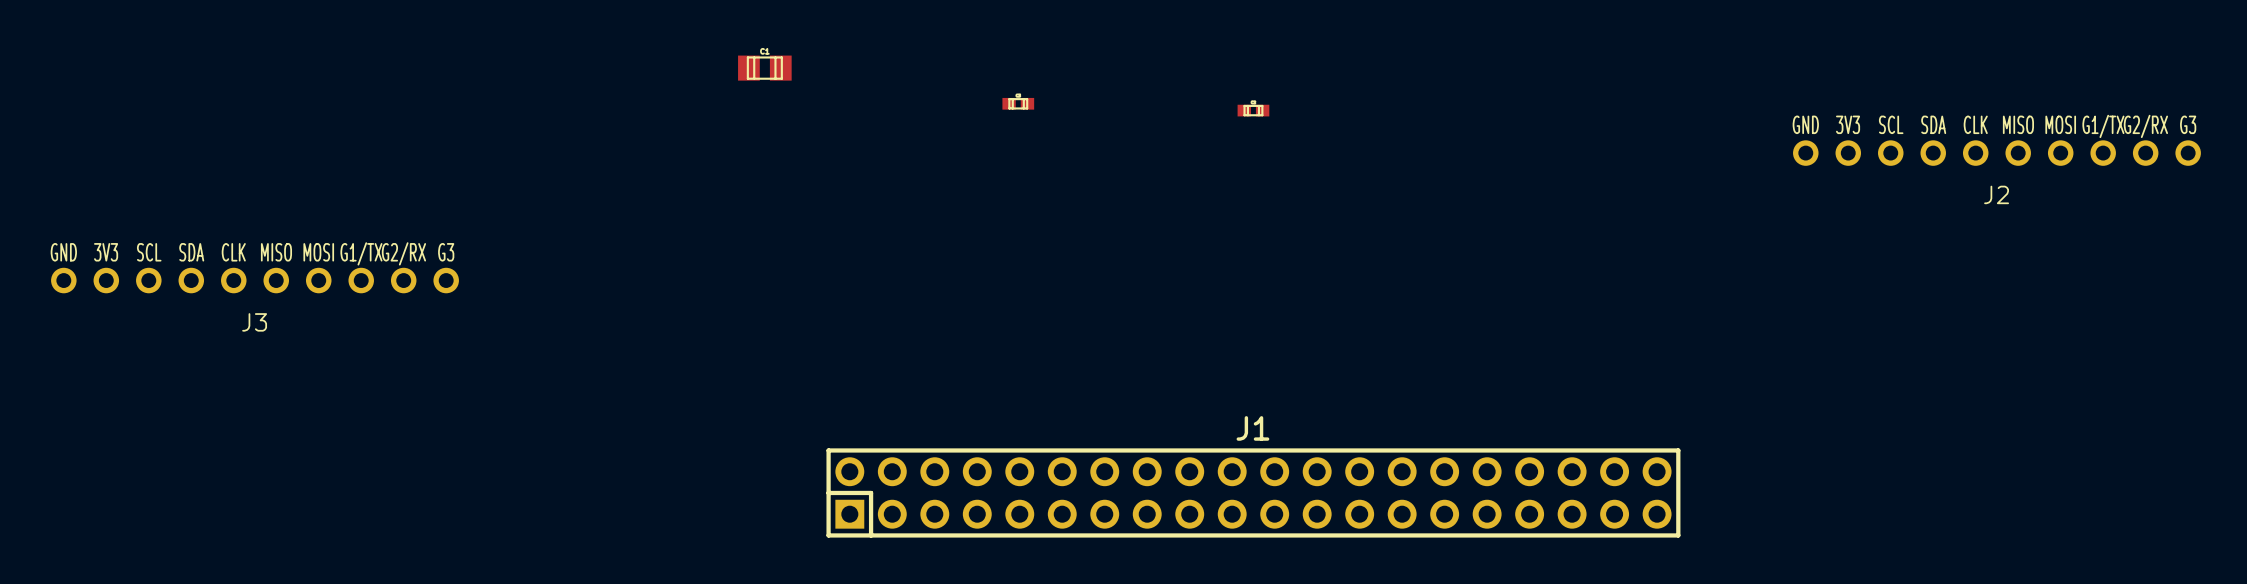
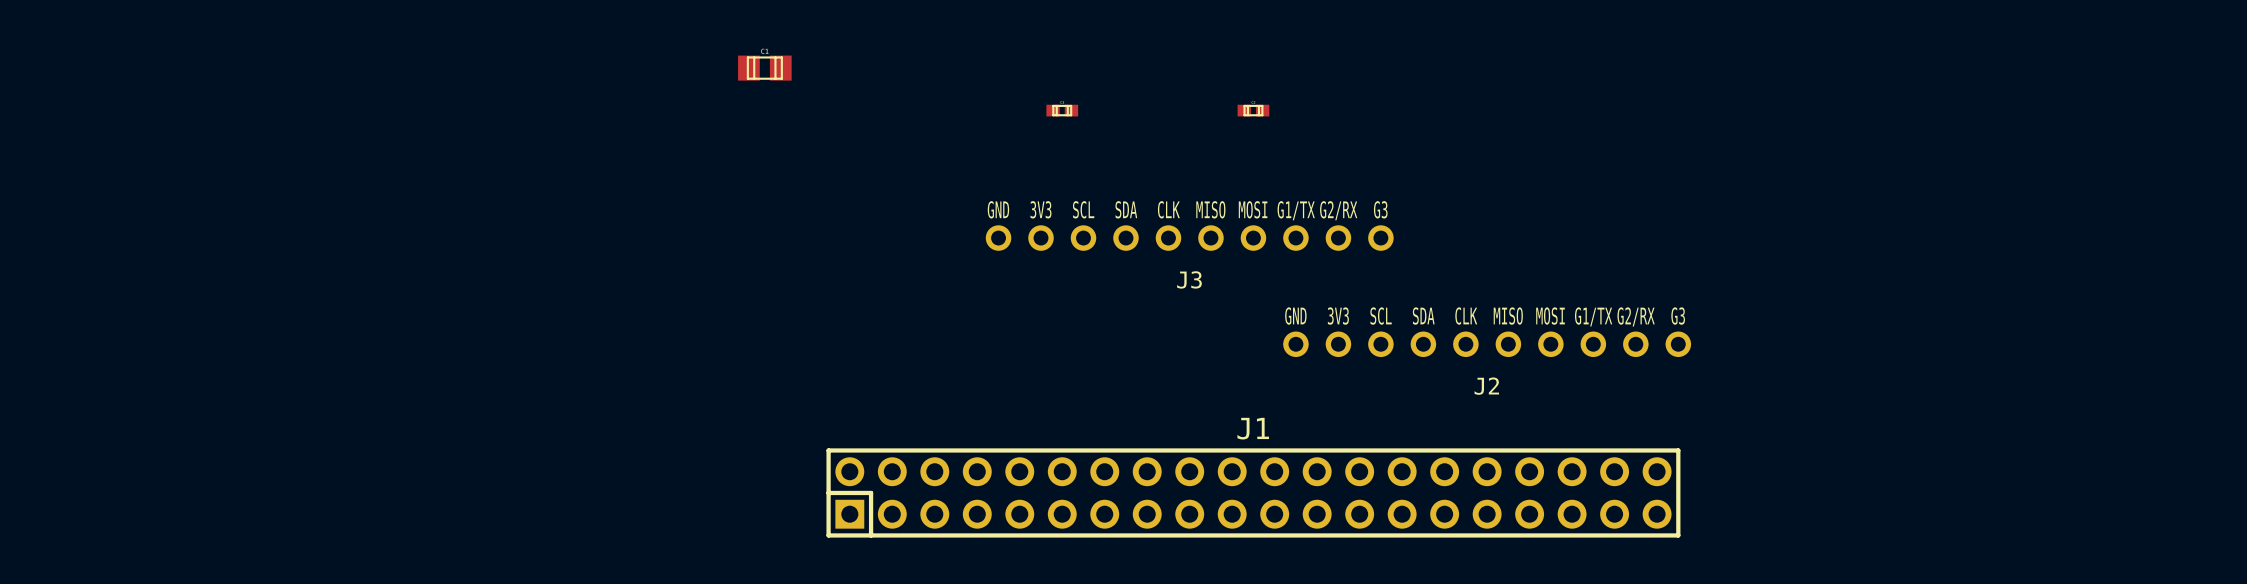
part position: (1018, 103) -> (1062, 110)
J2 position: (1996, 153) -> (1487, 344)
J3 position: (255, 280) -> (1189, 238)

